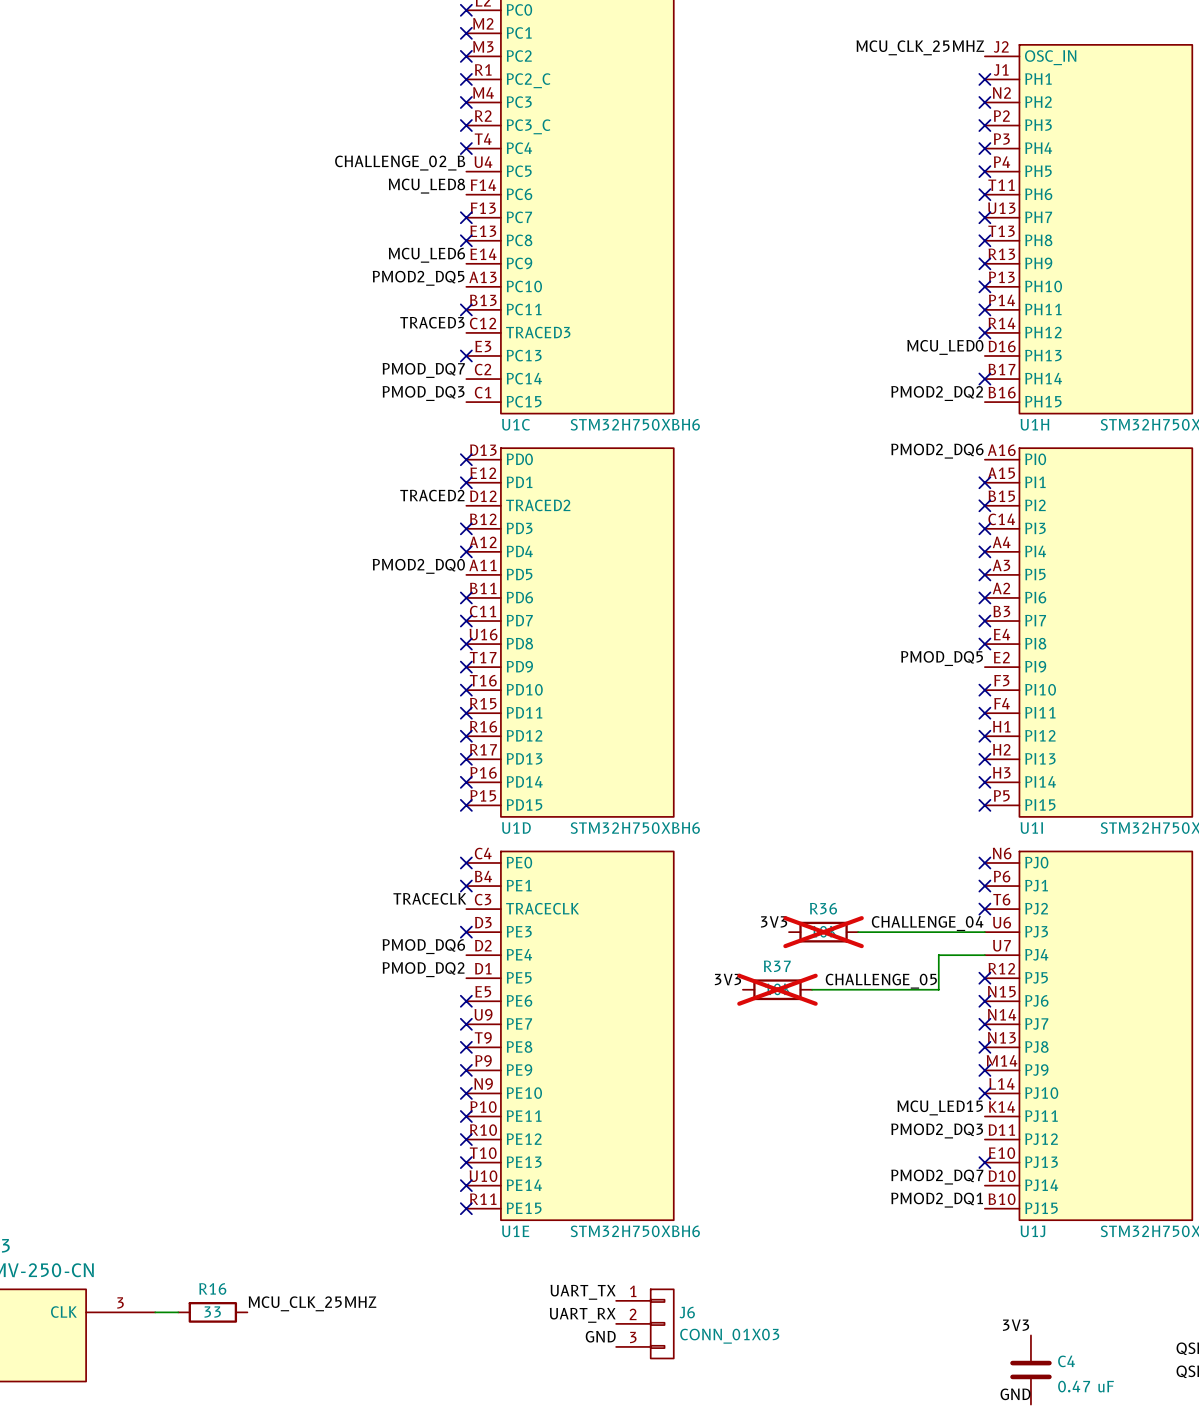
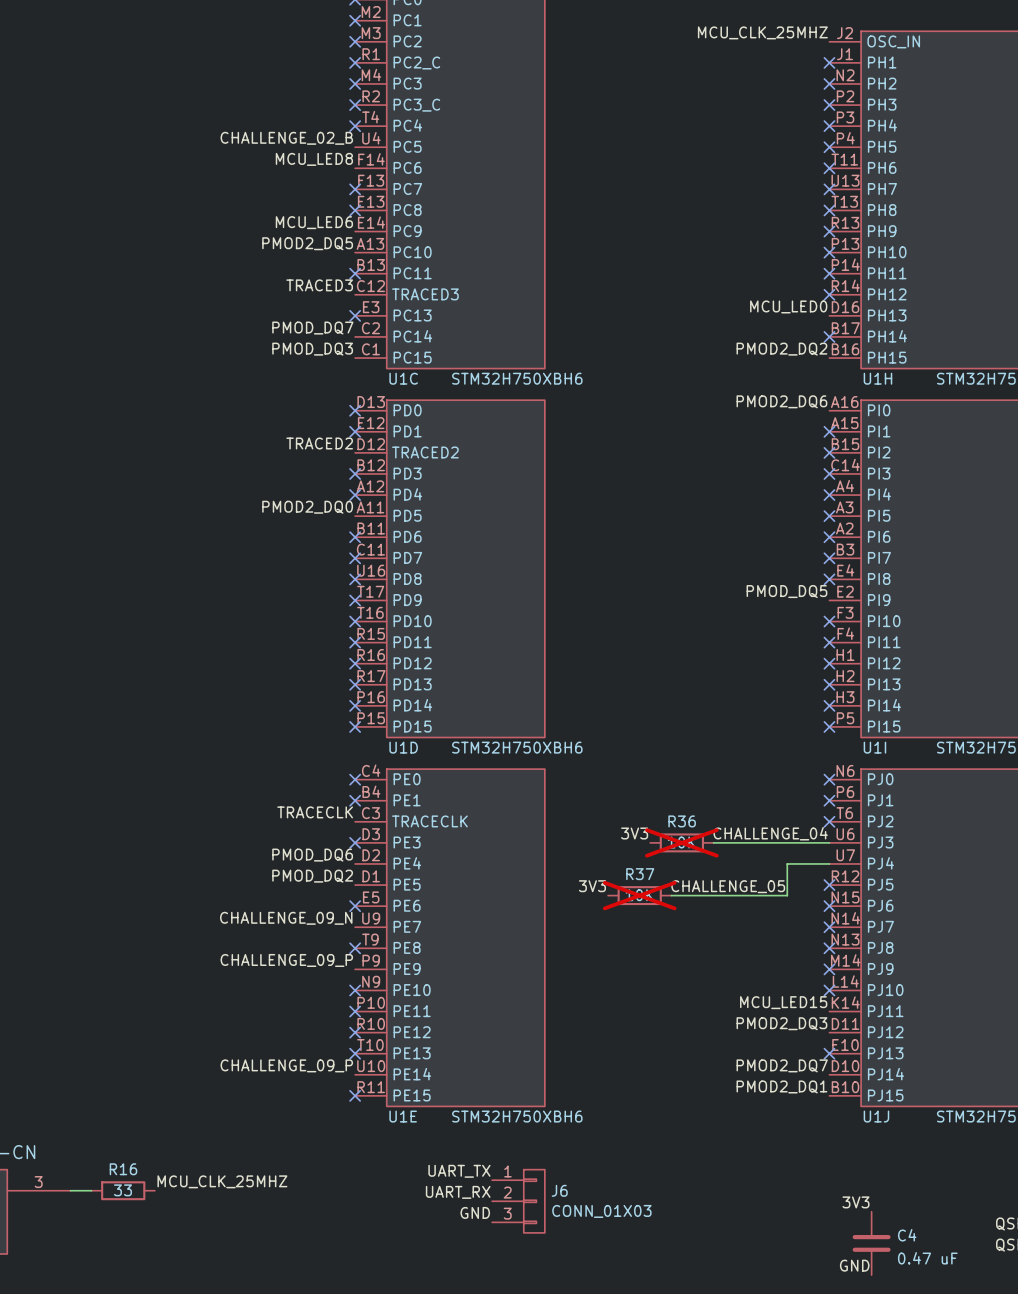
label: none -> CHALLENGE_09_N (286, 918)
no-connect mark: (466, 1024) -> none
label: none -> CHALLENGE_09_P (286, 960)
no-connect mark: (466, 1070) -> none
label: none -> CHALLENGE_09_P (286, 1065)
no-connect mark: (466, 1185) -> none

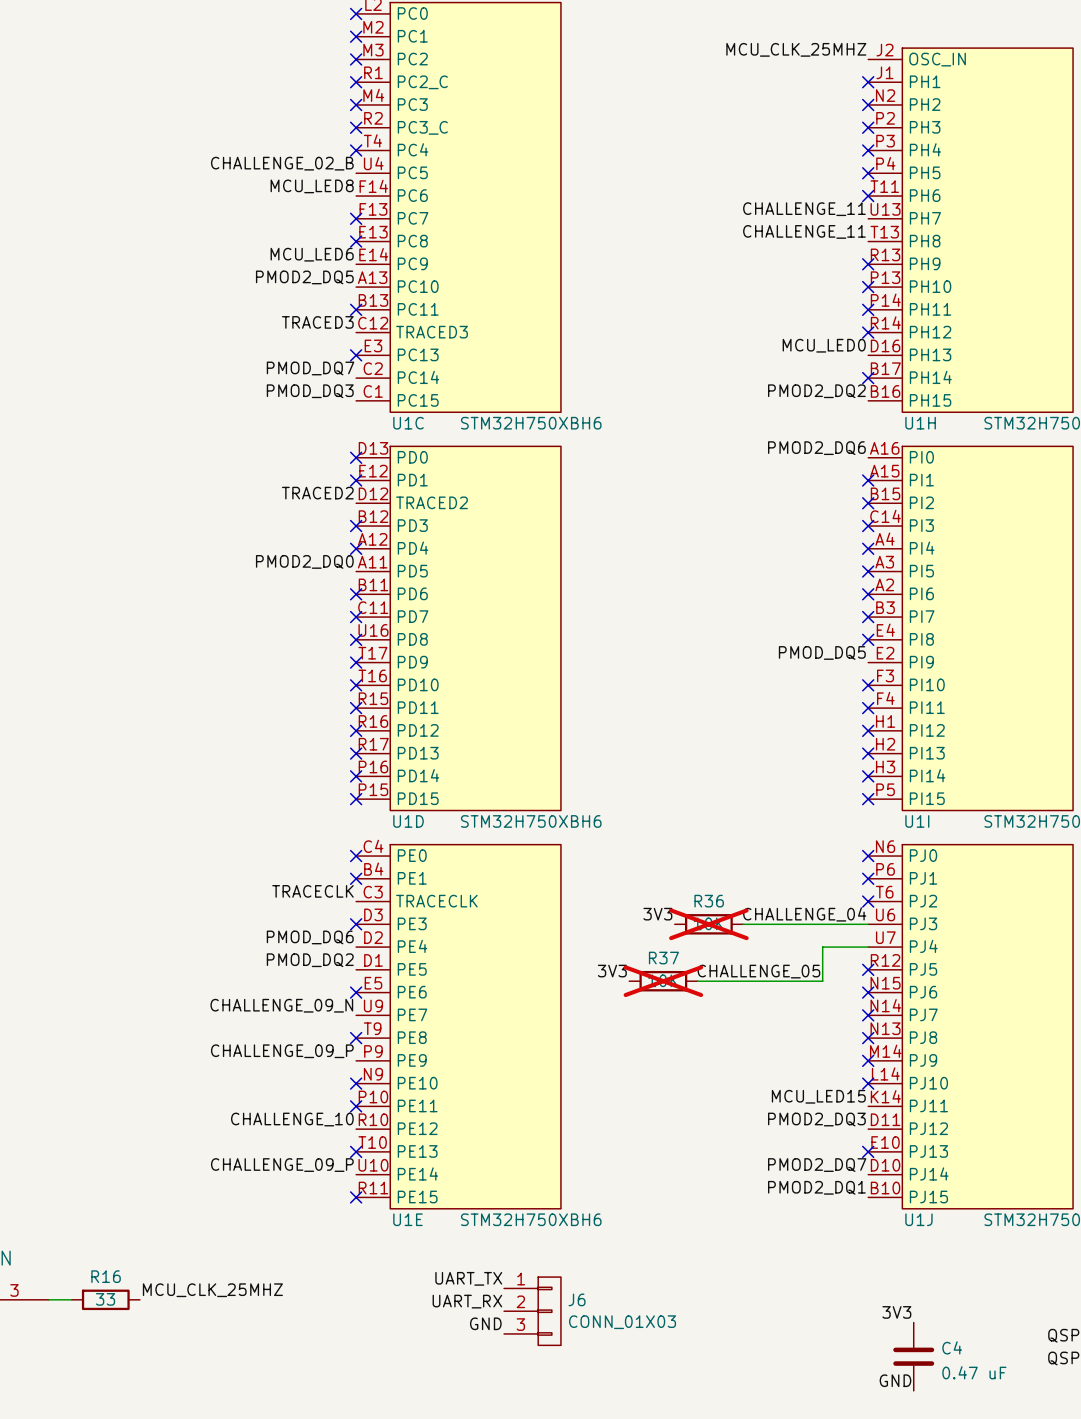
label: none -> CHALLENGE_11 (804, 209)
no-connect mark: (829, 189) -> none
label: none -> CHALLENGE_11 (804, 231)
no-connect mark: (829, 210) -> none
label: none -> CHALLENGE_10 (292, 1119)
no-connect mark: (355, 1032) -> none

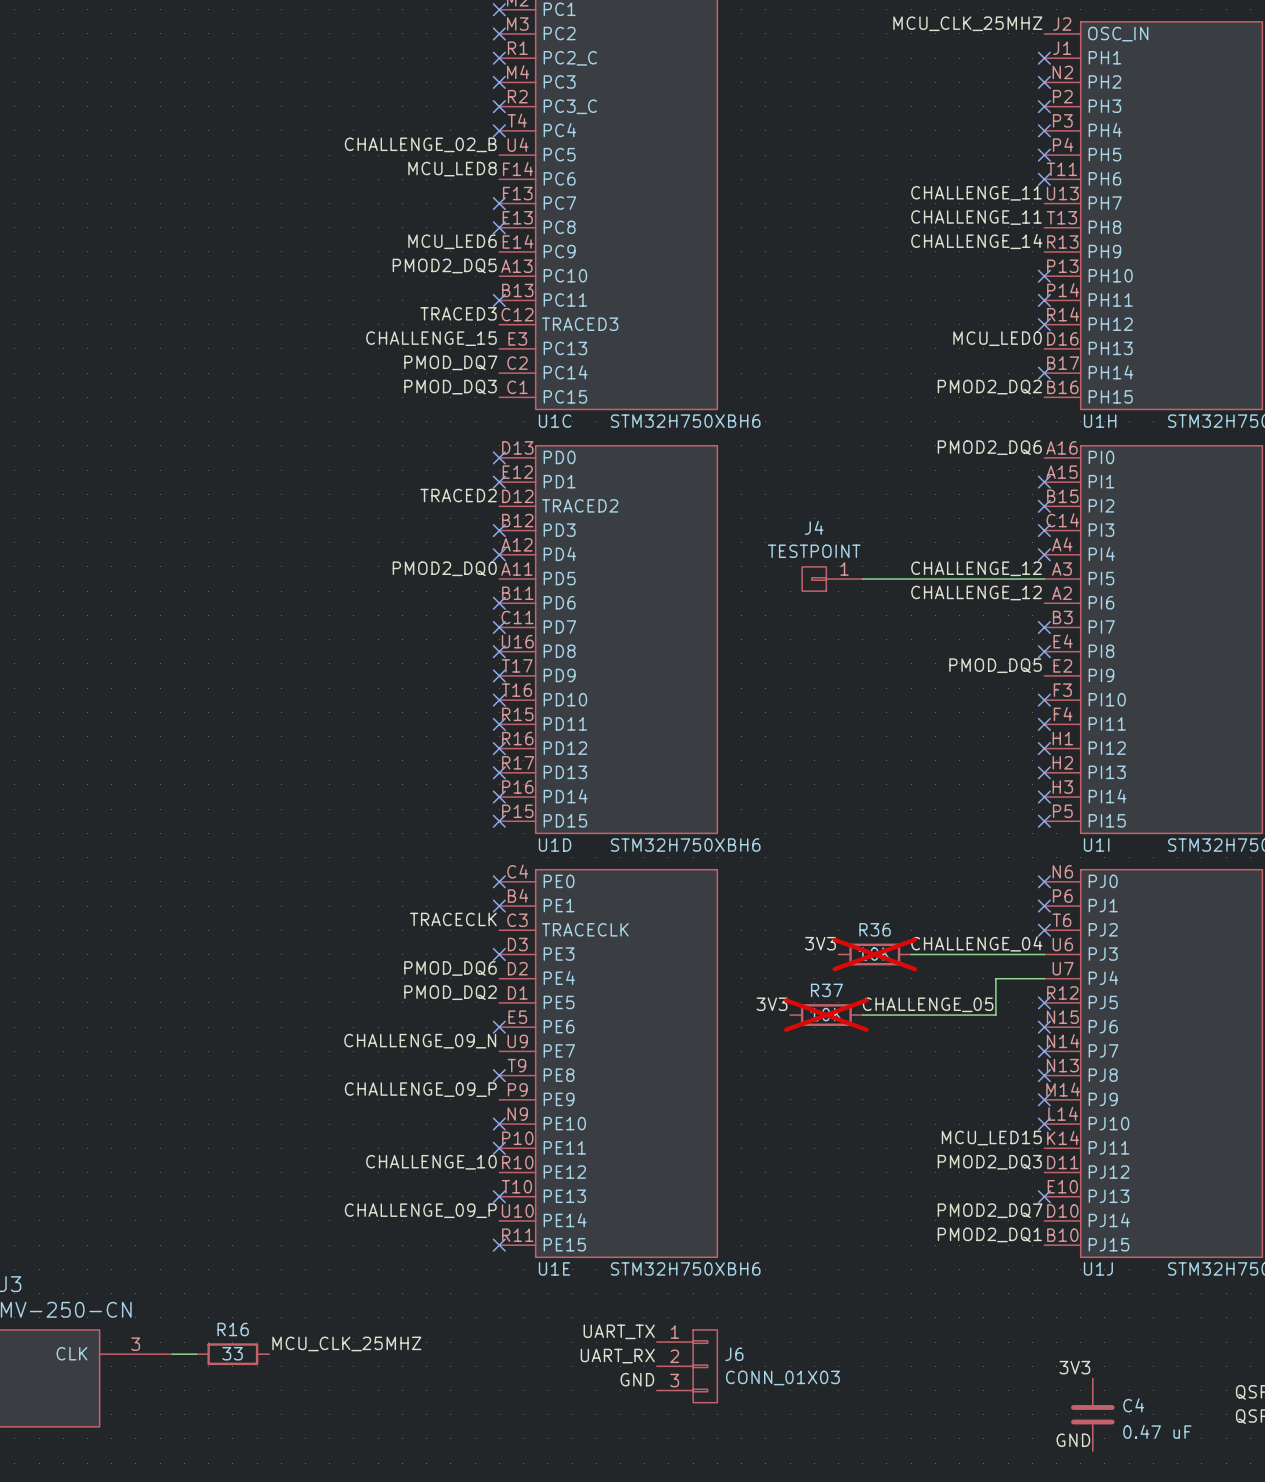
label: none -> CHALLENGE_14 (976, 241)
no-connect mark: (868, 264) -> none
label: none -> CHALLENGE_15 (431, 338)
no-connect mark: (356, 355) -> none
label: none -> CHALLENGE_12 (976, 568)
J4: none -> TESTPOINT (832, 579)
wire: none -> (862, 579) (1044, 579)
no-connect mark: (868, 571) -> none
label: none -> CHALLENGE_12 (976, 593)
no-connect mark: (868, 594) -> none

